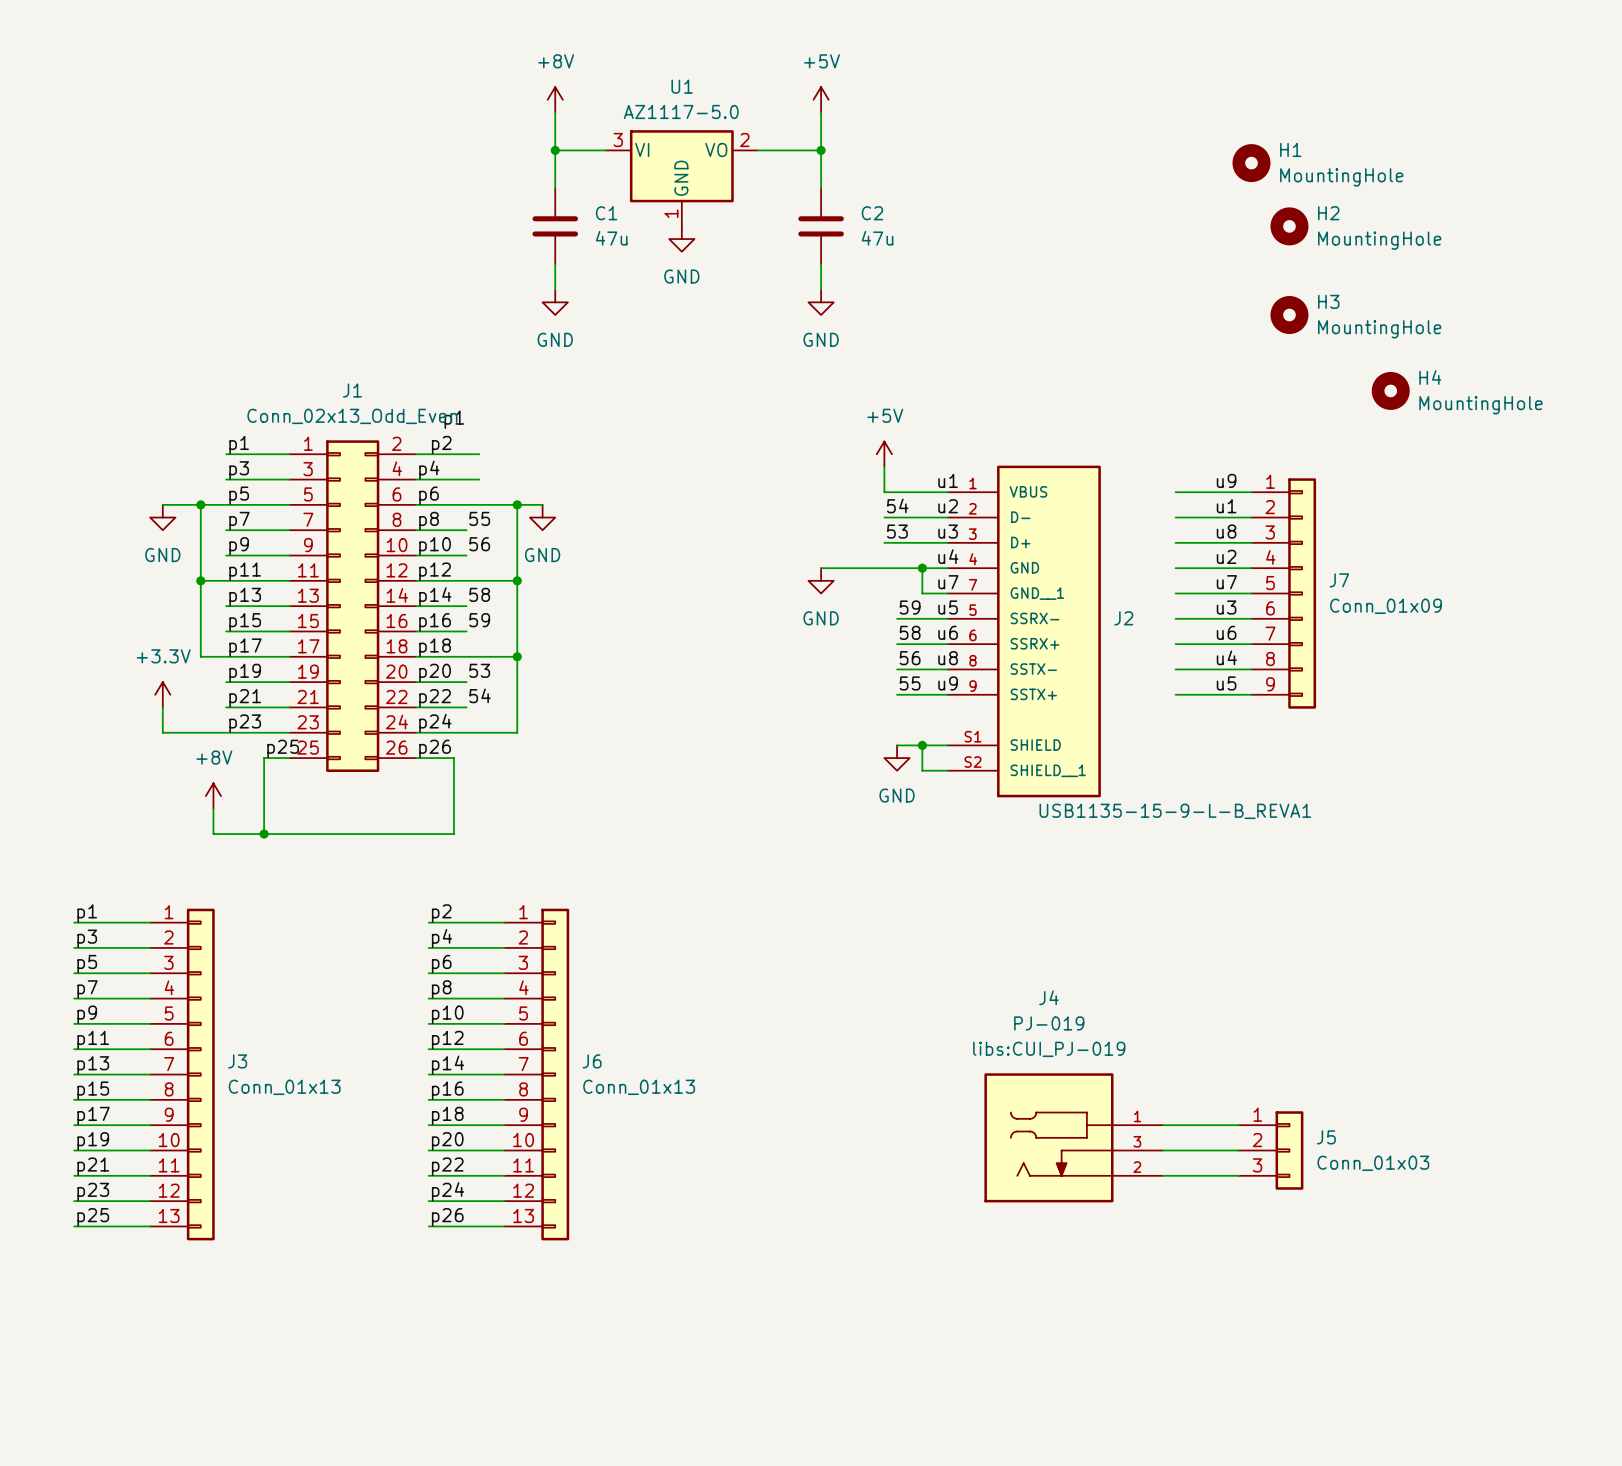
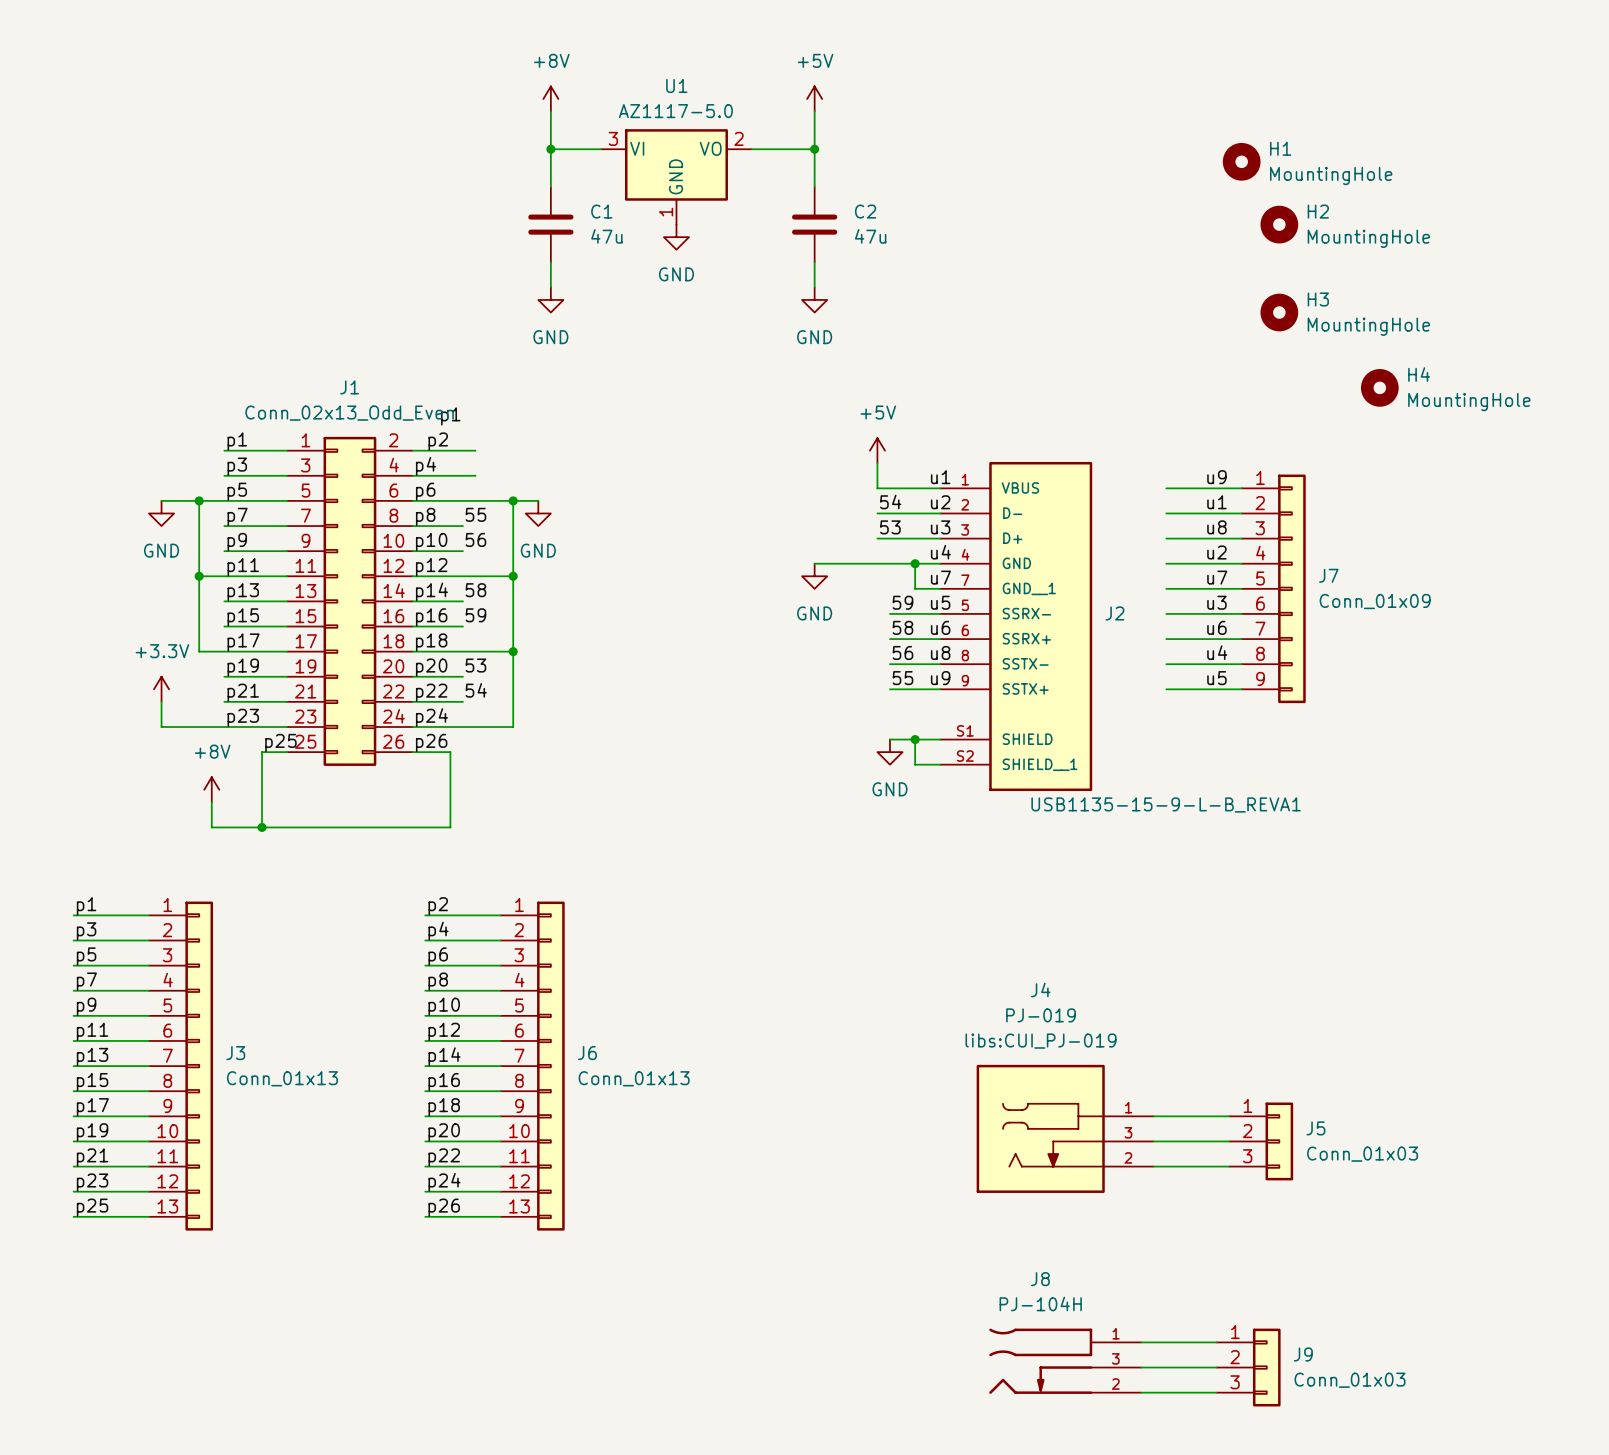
wire: none -> (1141, 1342) (1216, 1342)
J8: none -> PJ-104H (1065, 1361)
wire: none -> (1141, 1367) (1216, 1367)
J9: none -> Conn_01x03 (1248, 1367)
wire: none -> (1141, 1392) (1216, 1392)

